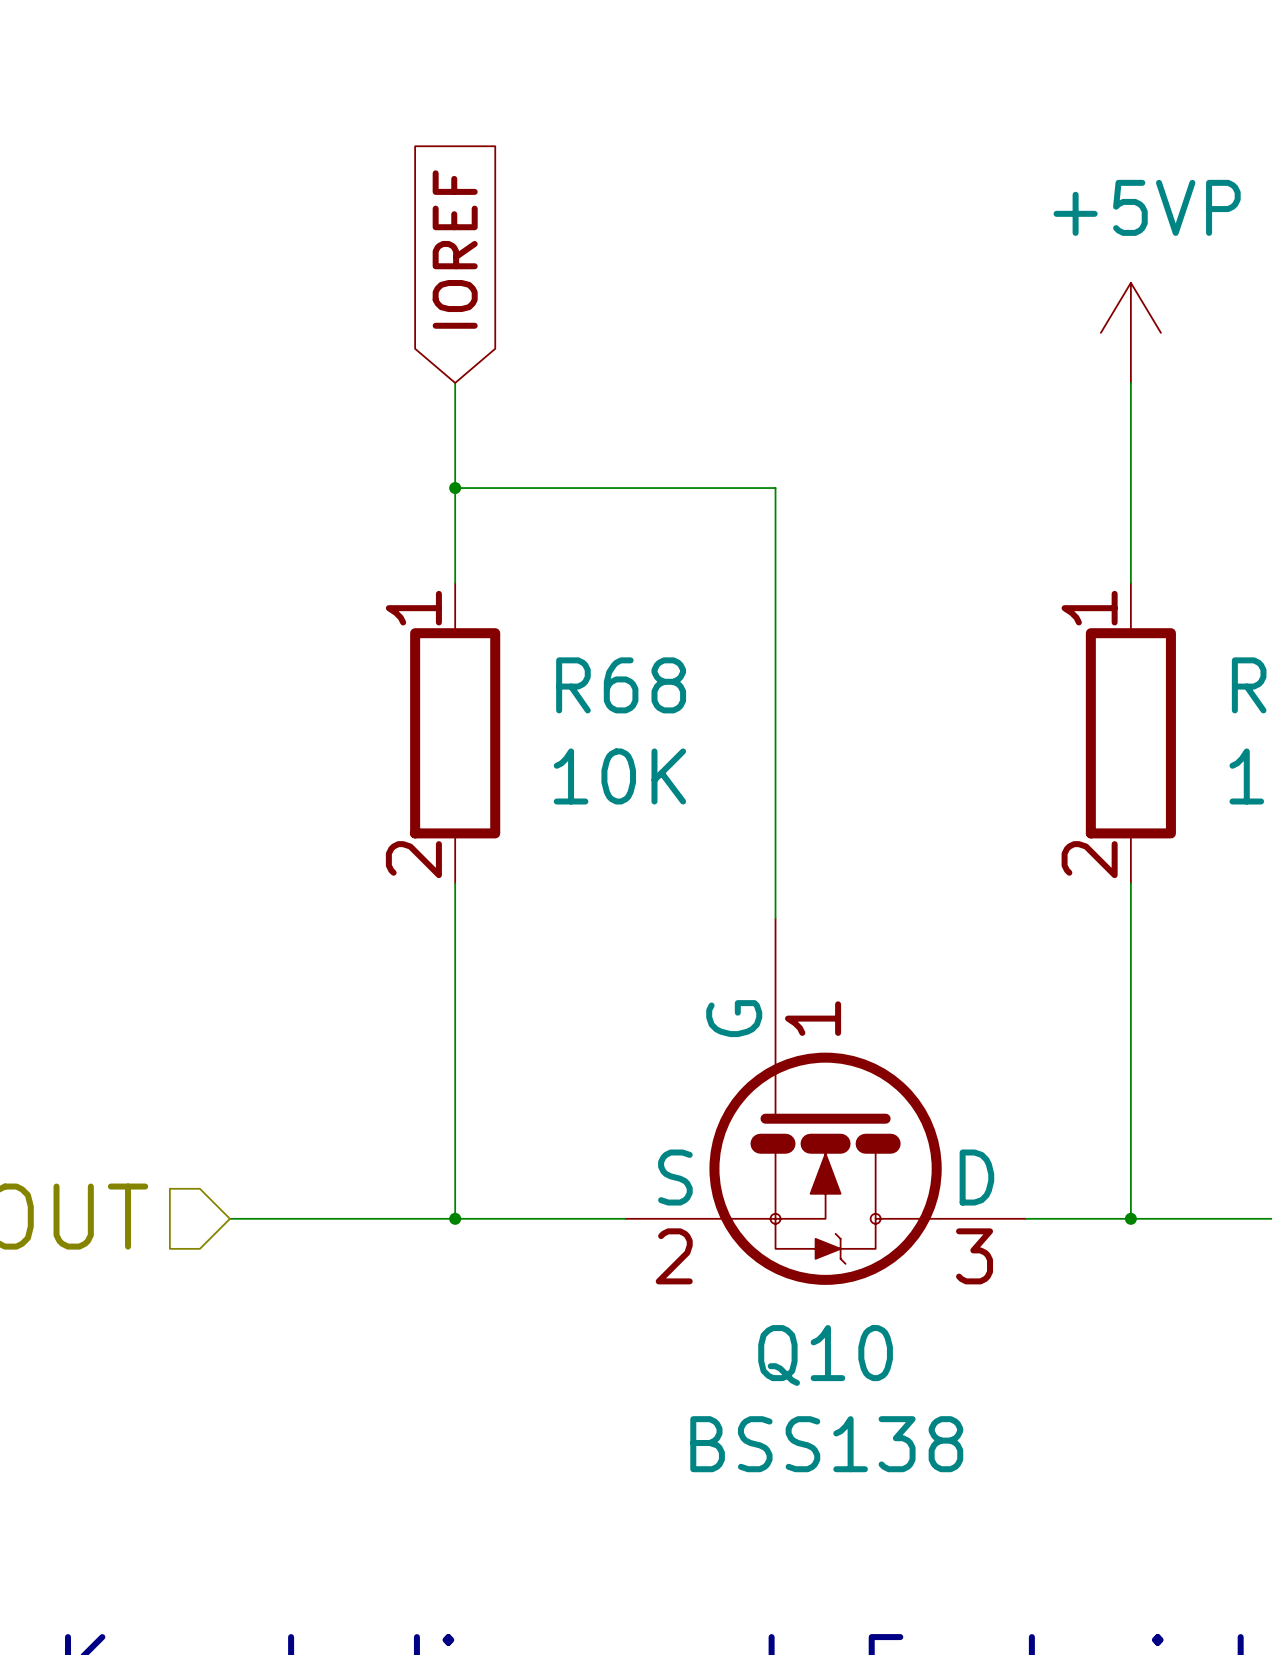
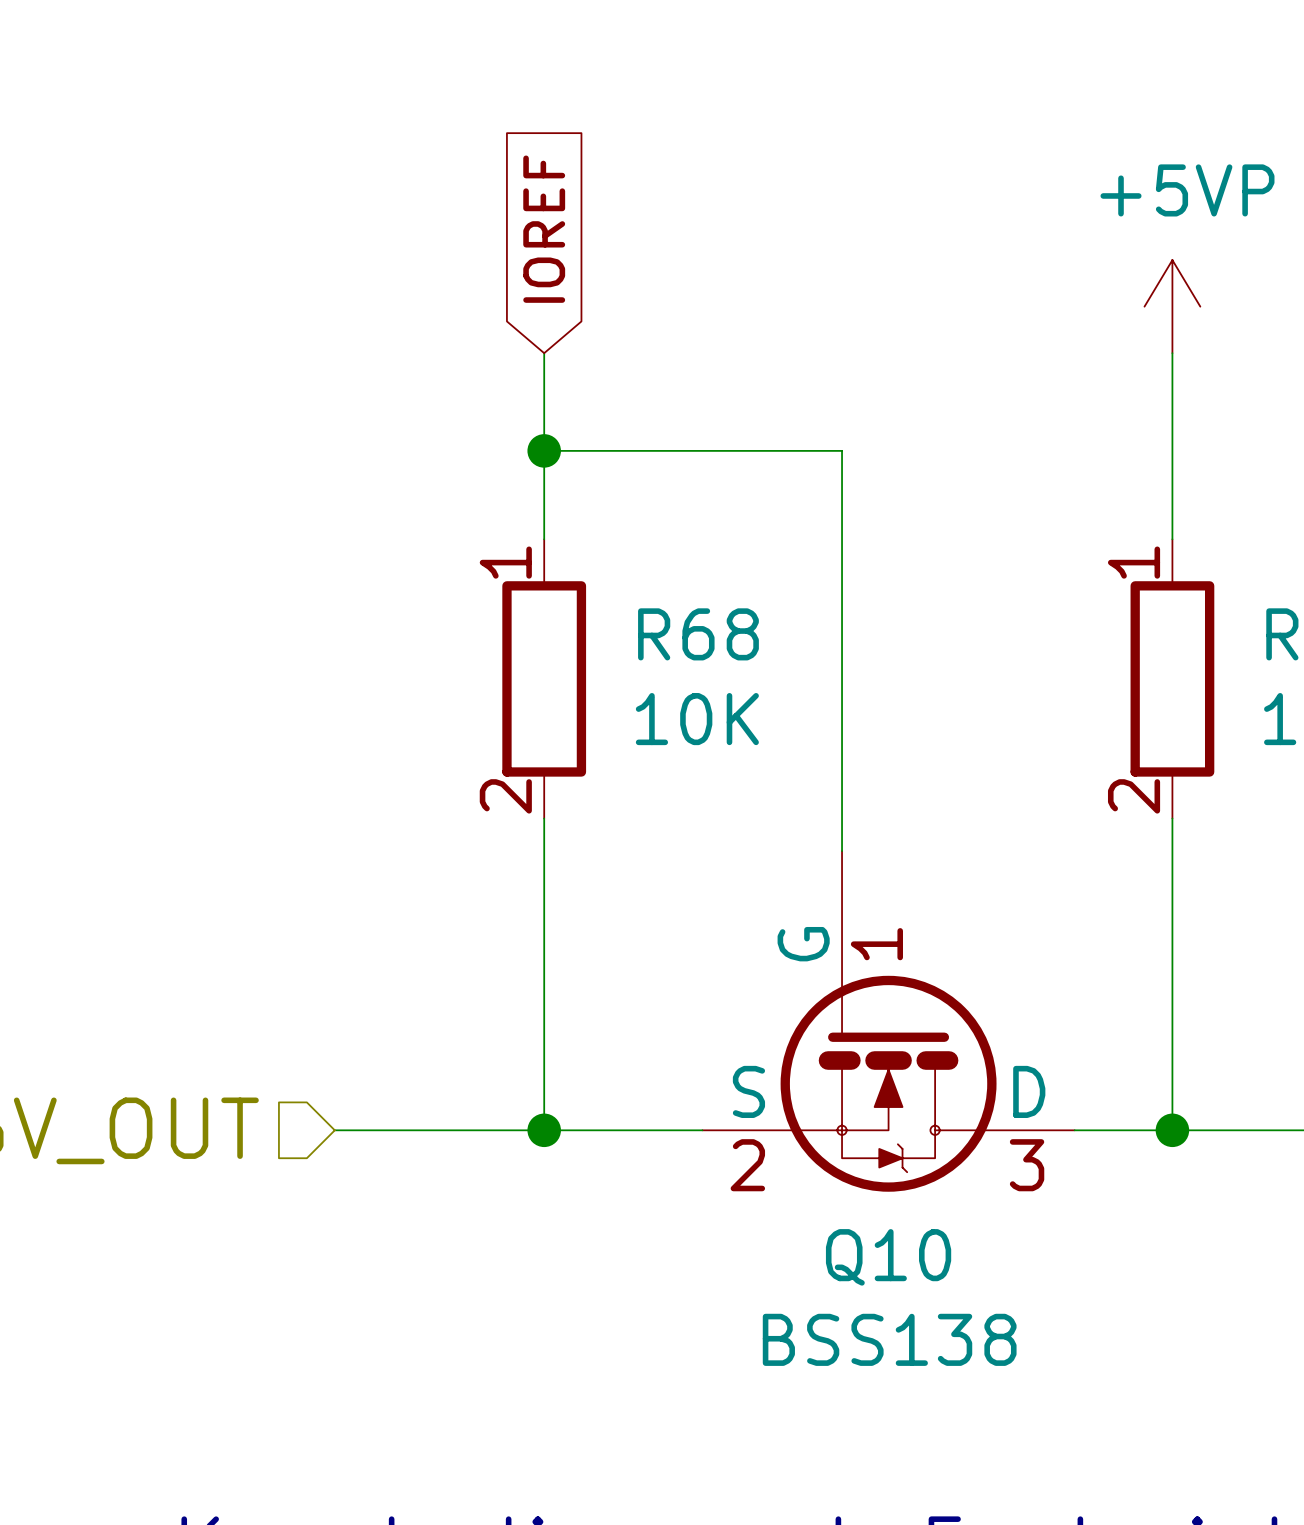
junction size: [449, 482, 462, 495] -> [527, 434, 561, 468]
junction size: [449, 1212, 462, 1225] -> [527, 1113, 561, 1148]
junction size: [1124, 1212, 1137, 1225] -> [1155, 1113, 1190, 1148]

